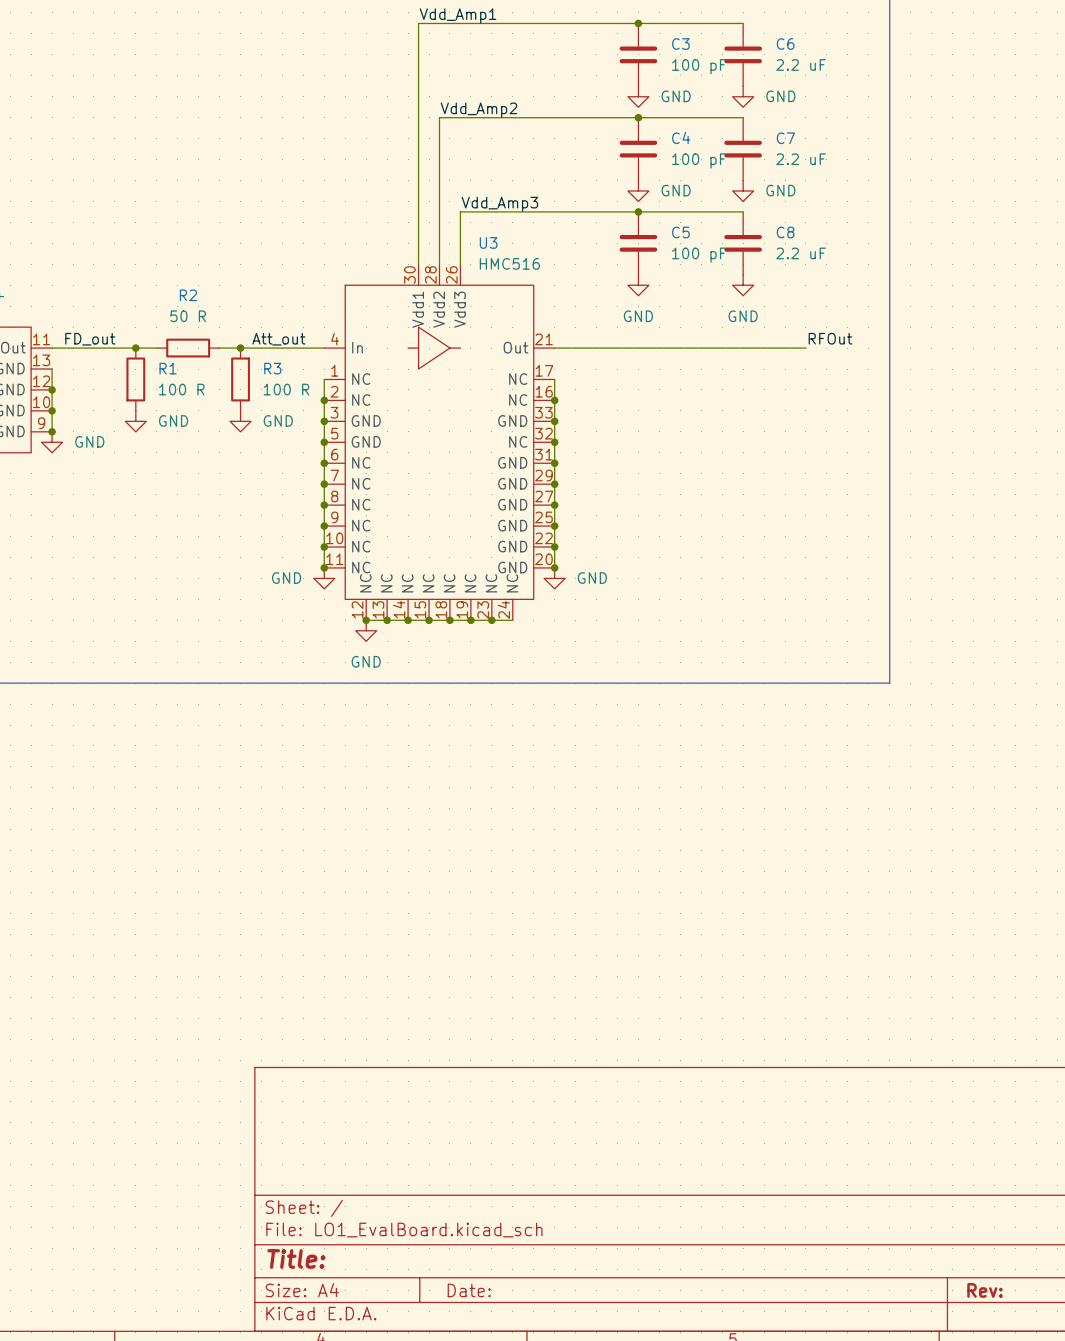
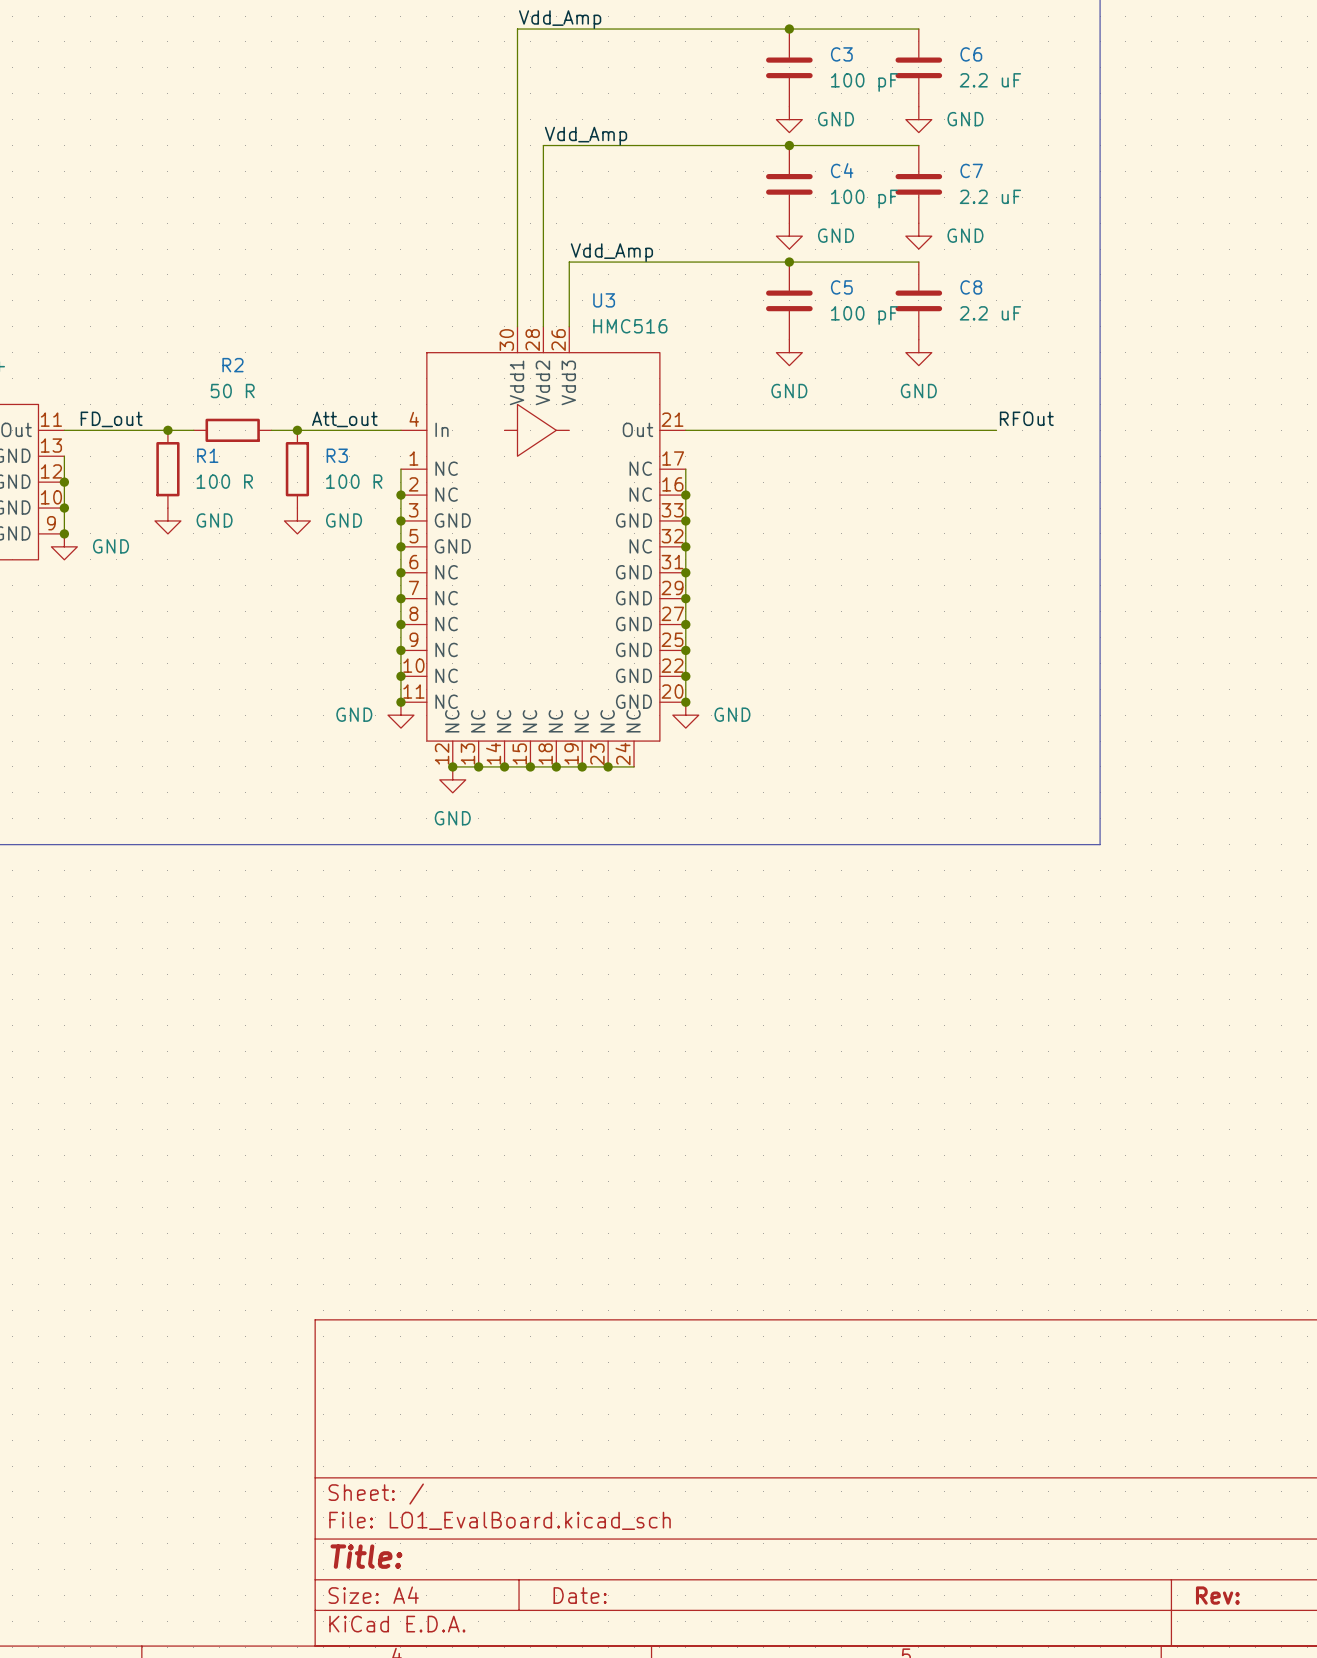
label: Vdd_Amp1 (458, 15) -> Vdd_Amp (560, 19)
label: Vdd_Amp2 (478, 110) -> Vdd_Amp (586, 136)
label: Vdd_Amp3 (499, 204) -> Vdd_Amp (611, 252)

